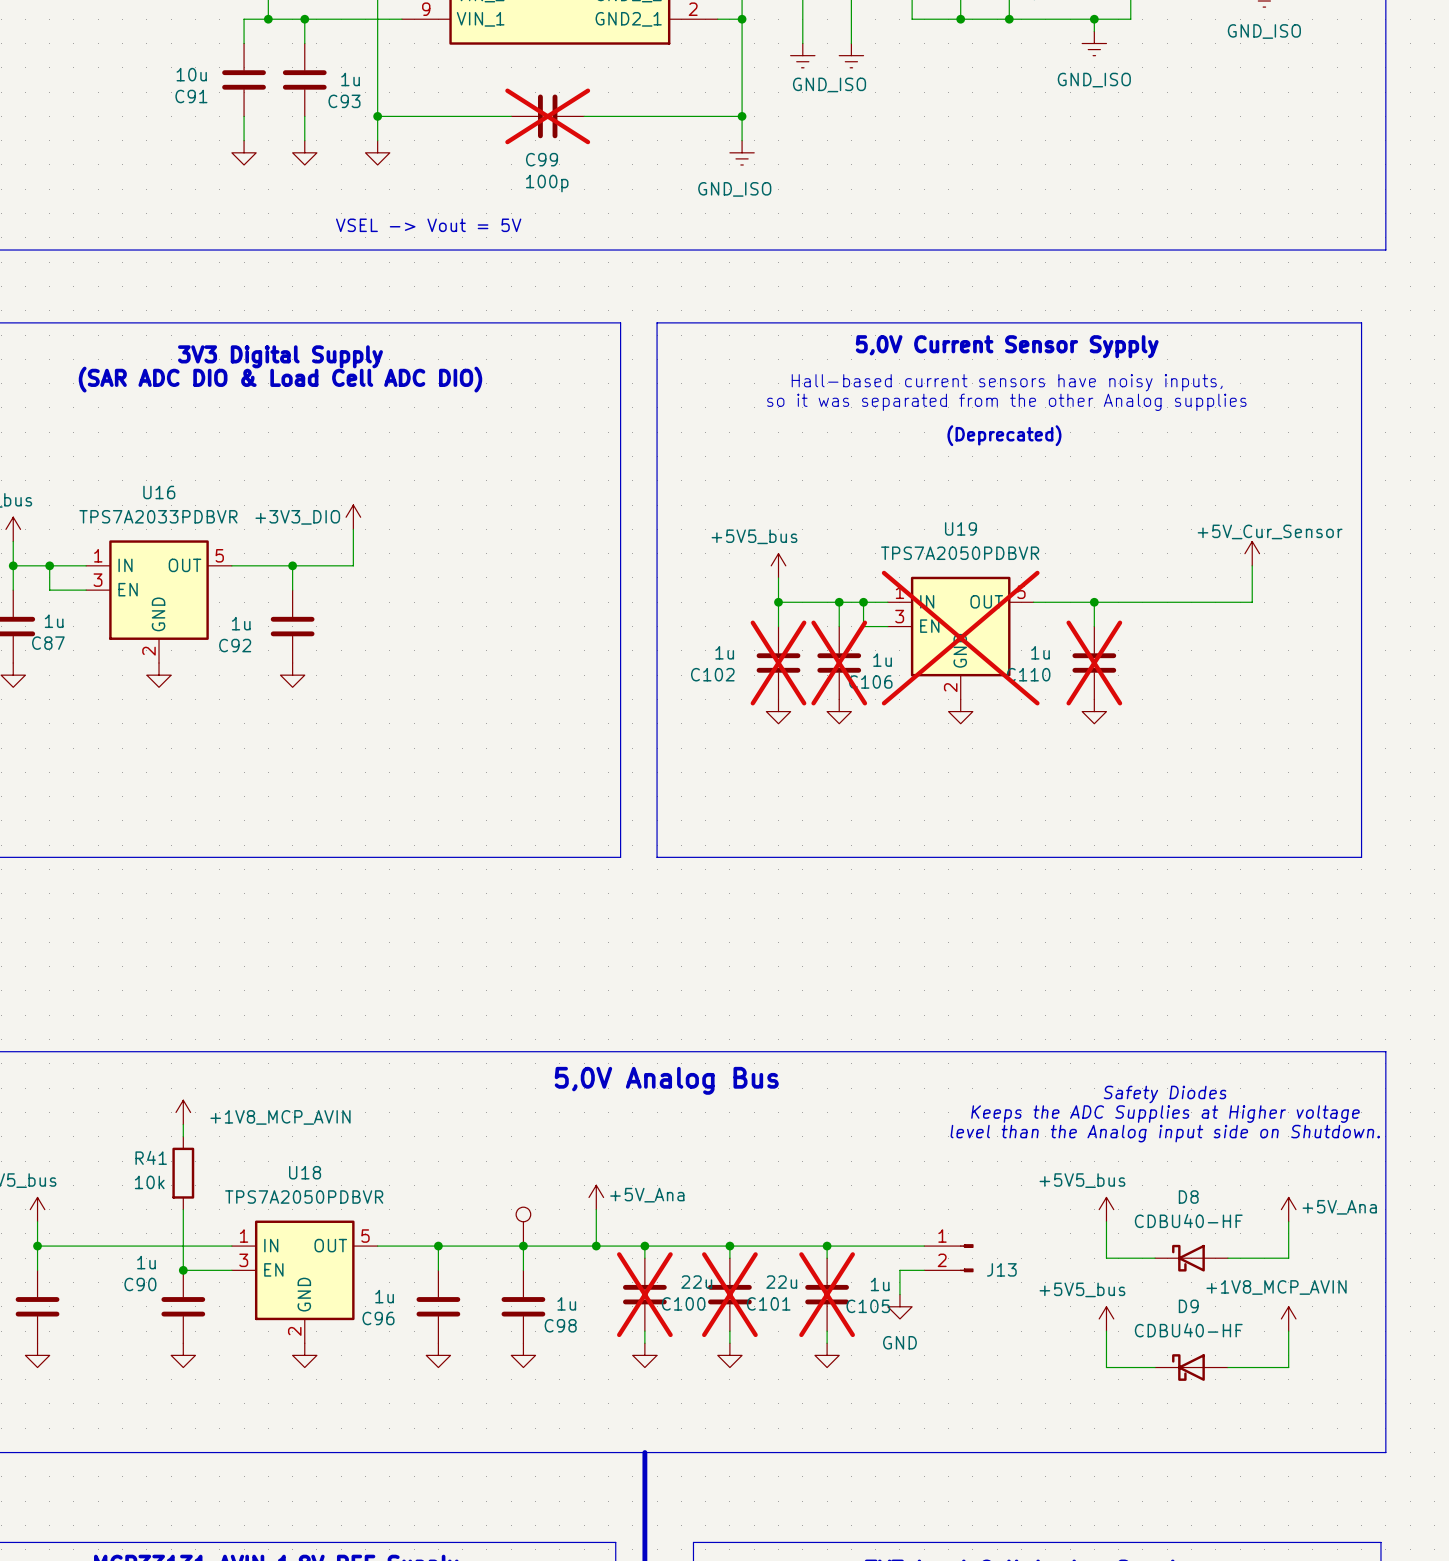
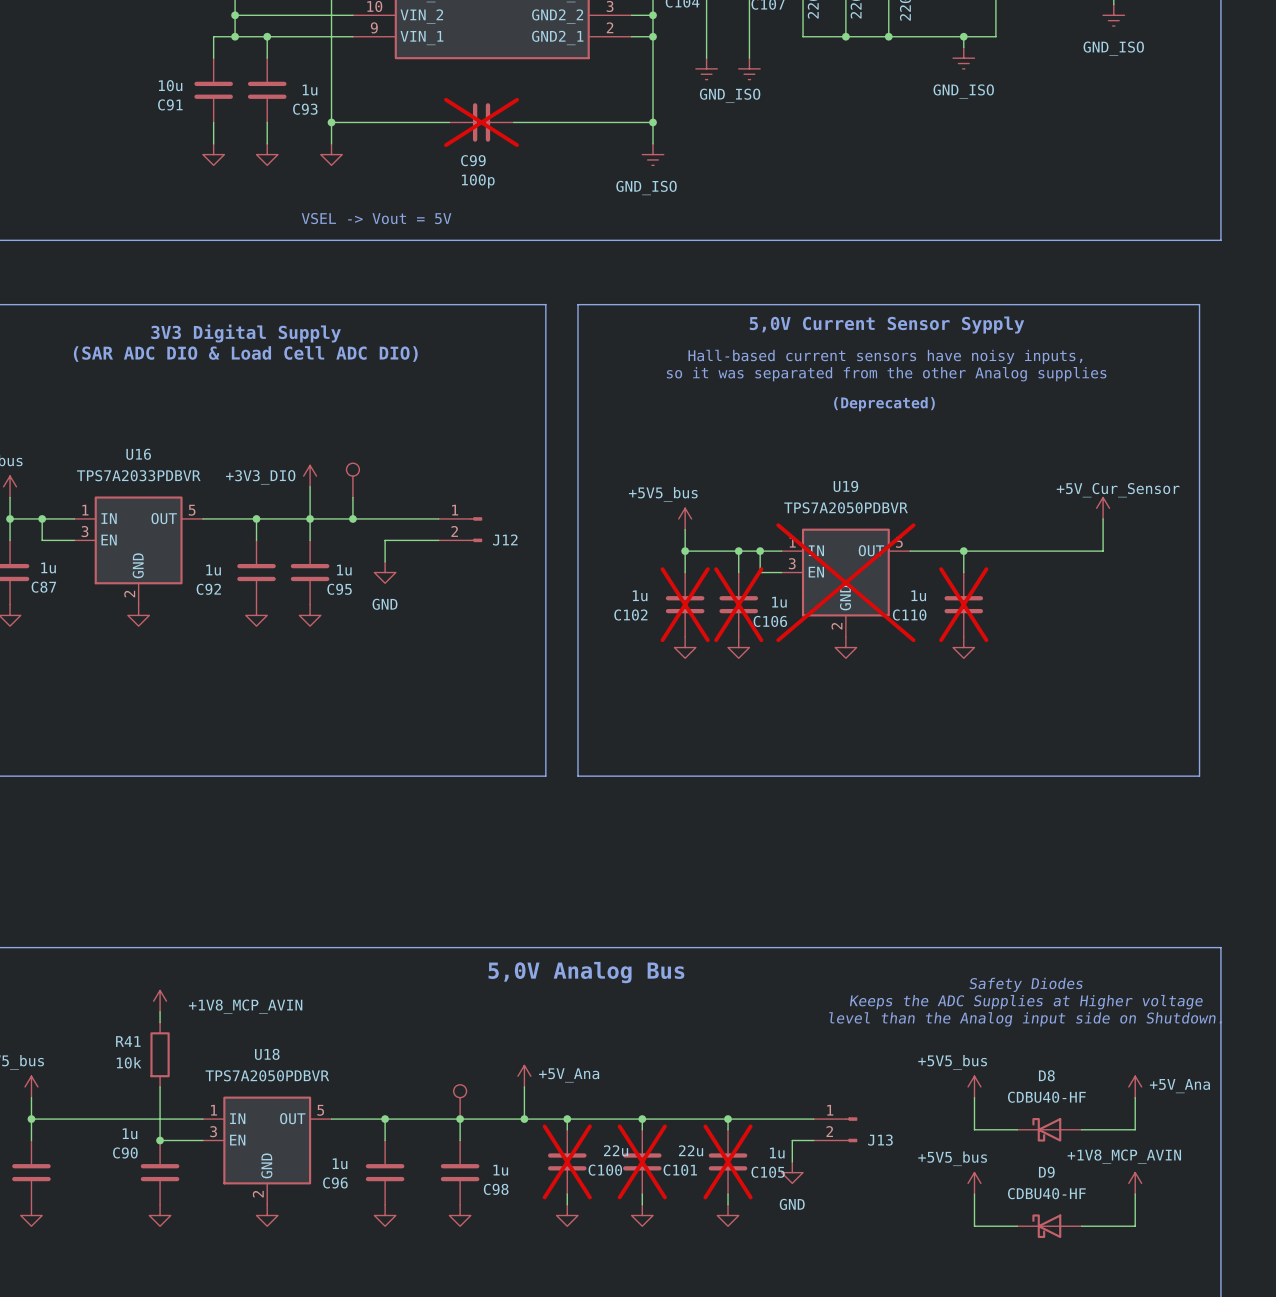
part: none -> (352, 480)
wire: none -> (352, 497) (352, 518)
junction: none -> (310, 518)
junction: none -> (352, 518)
wire: none -> (438, 518) (310, 518) (310, 540)
J12: none -> (460, 529)
wire: none -> (438, 540) (385, 540) (385, 561)
C95: none -> 1u (310, 572)
power symbol: none -> GND (385, 572)
power symbol: none -> (310, 615)

